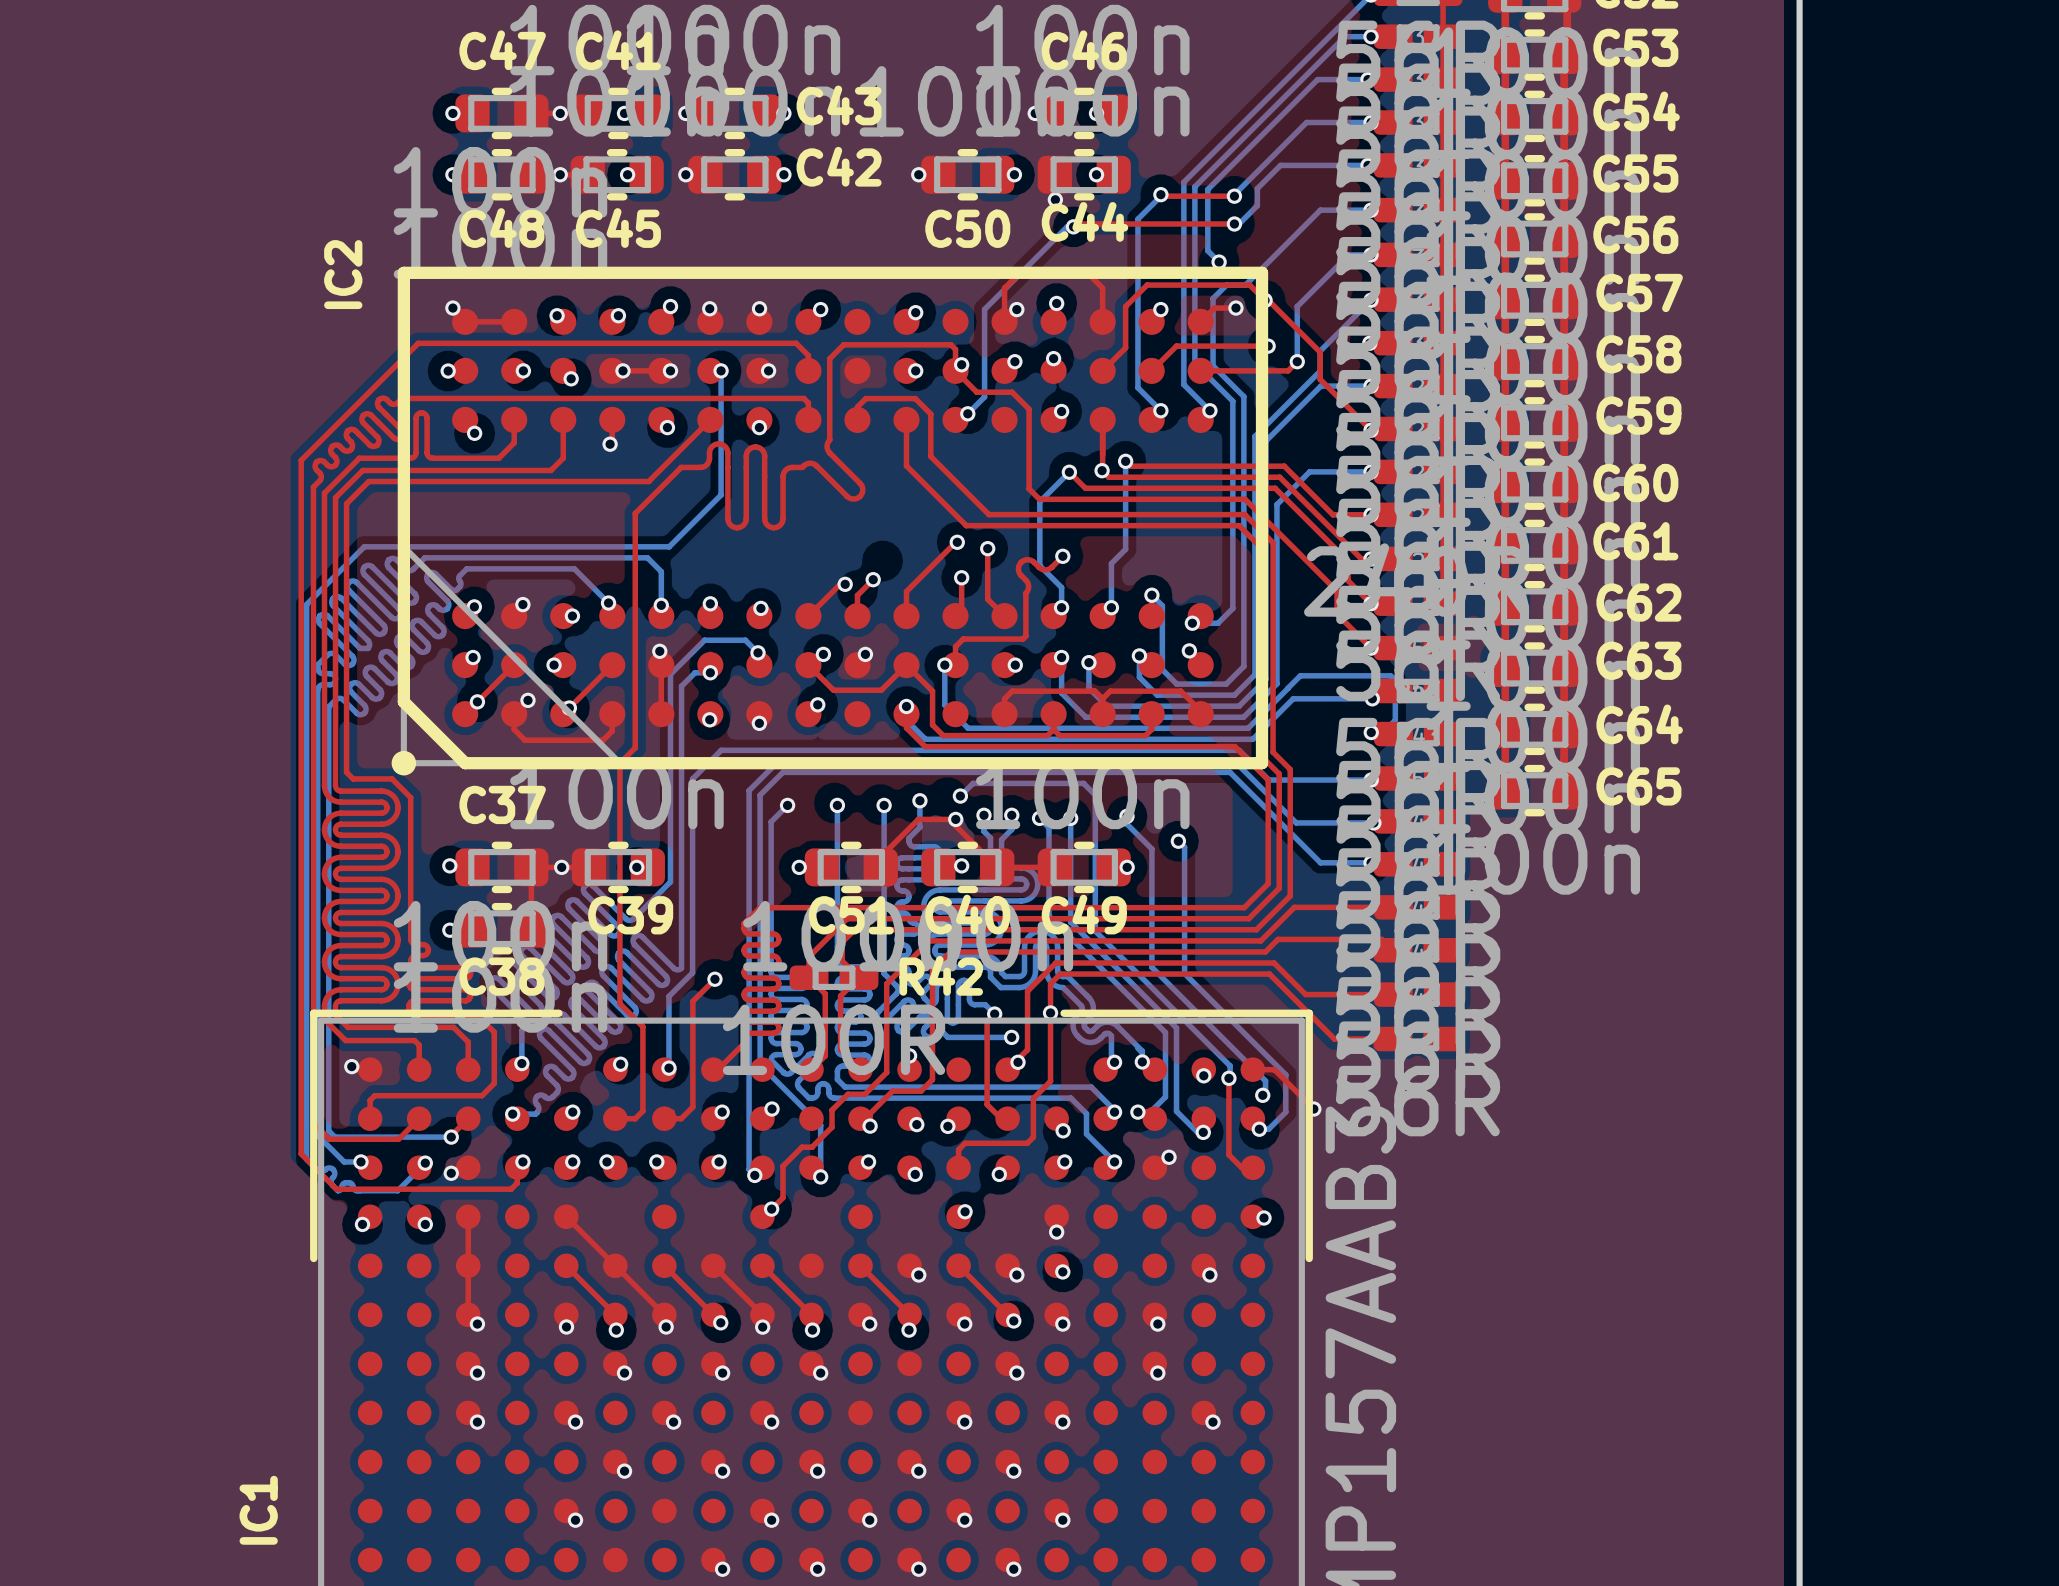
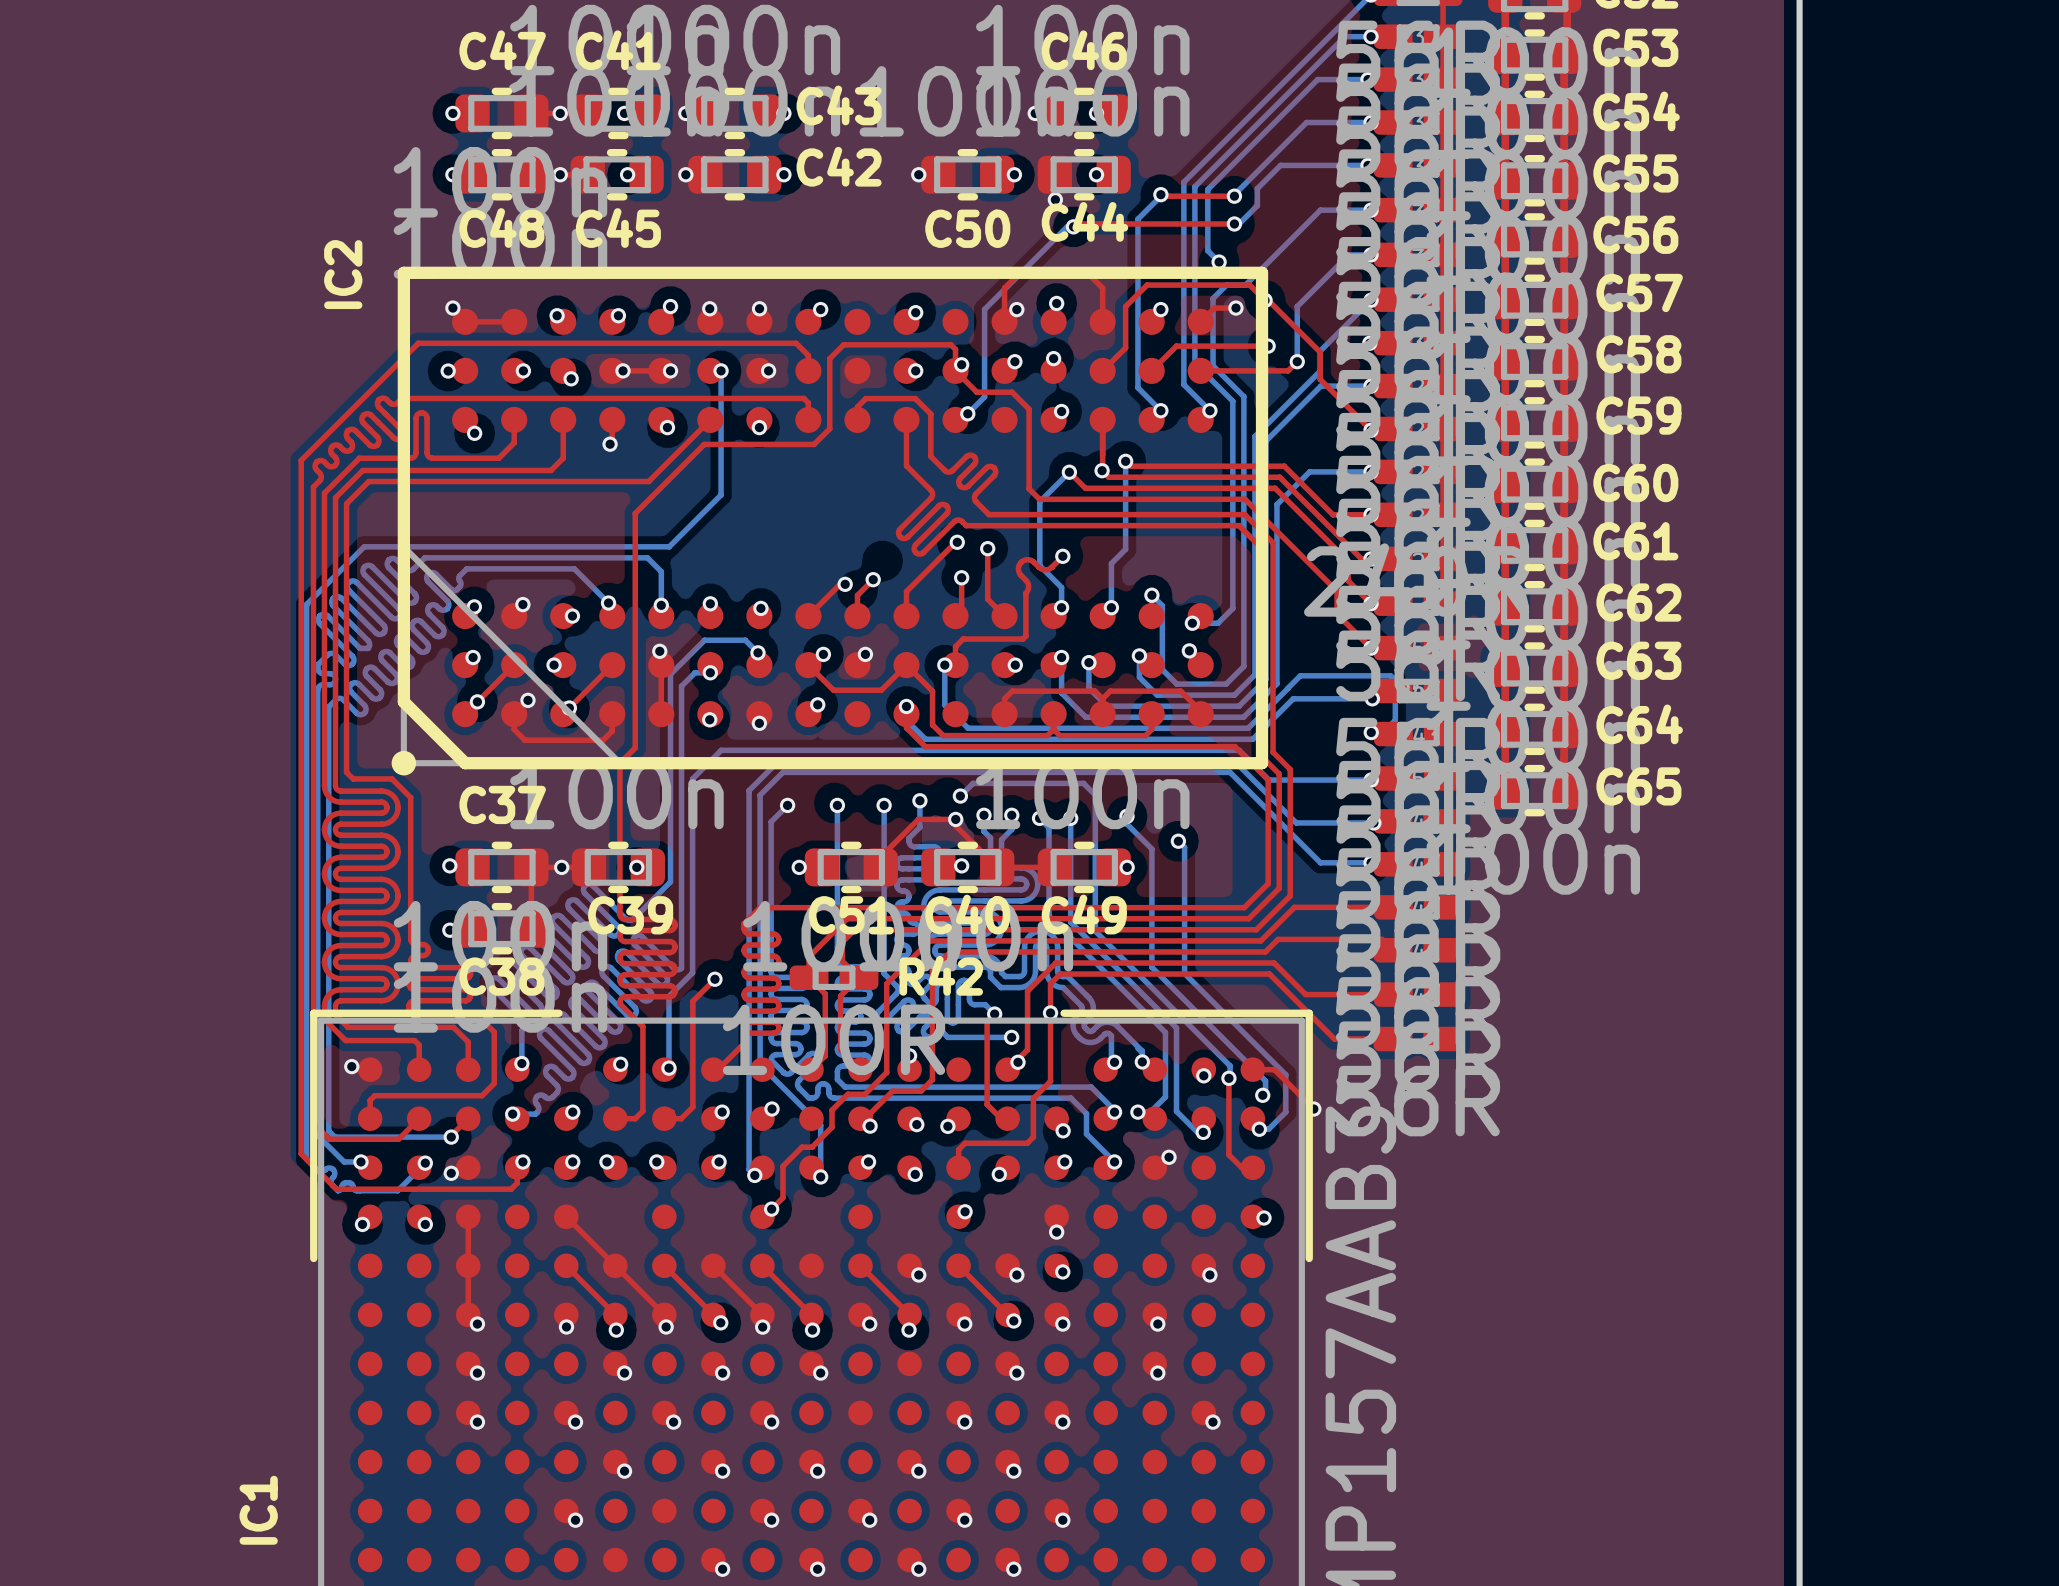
top track: (829, 428) (827, 450) (860, 484) (861, 493) (855, 498) (848, 497) (813, 463) (807, 463) (802, 467) (788, 468) (783, 475) (782, 520) (776, 527) (769, 526) (764, 520) (764, 454) (760, 448) (751, 447) (746, 453) (746, 519) (744, 524) (739, 527) (732, 526) (727, 519) (727, 453) (725, 446) (718, 443) (712, 446) (708, 461) (703, 466) (681, 467) -> (829, 428) (814, 444) (704, 444) (681, 467)
top track: (944, 470) (976, 501) -> (952, 470) (967, 455) (971, 455) (974, 457) (974, 463) (959, 480) (960, 485) (964, 487) (987, 467) (994, 468) (994, 475) (975, 494) (976, 501)
top track: none -> (944, 470) (948, 472) (952, 470)
top track: (931, 490) (962, 521) -> (931, 490) (931, 497) (899, 529) (899, 536) (903, 538) (907, 537) (940, 504) (946, 505) (948, 511) (915, 545) (915, 552) (923, 552) (955, 520) (962, 521)
top track: (619, 913) (619, 1002) -> (619, 913) (624, 919) (670, 919) (675, 925) (670, 930) (622, 931) (619, 936) (623, 941) (670, 941) (675, 947) (670, 952) (624, 952) (620, 956) (621, 962) (670, 963) (675, 969) (670, 974) (622, 975) (619, 980) (623, 985) (670, 985) (673, 987) (675, 991) (670, 996) (624, 996) (619, 1002)

